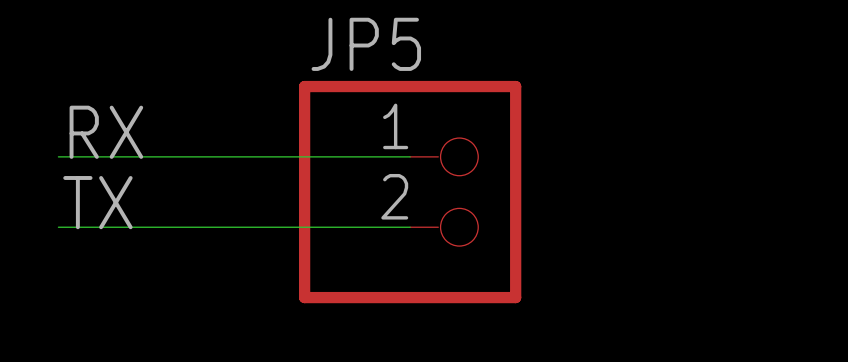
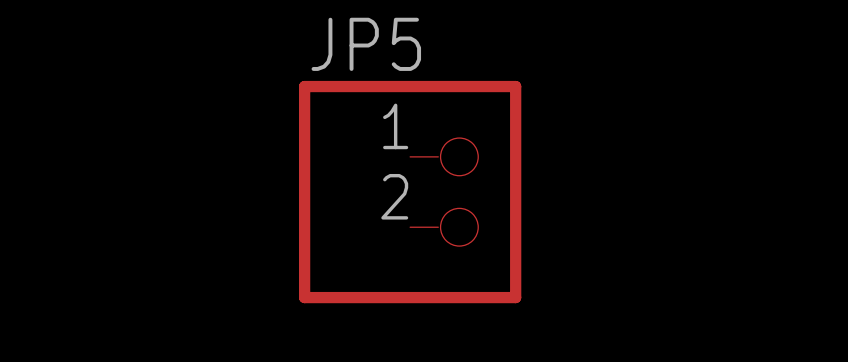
label: RX (106, 132) -> none
wire: (58, 156) (410, 156) -> none
label: TX (97, 202) -> none
wire: (58, 227) (410, 227) -> none

